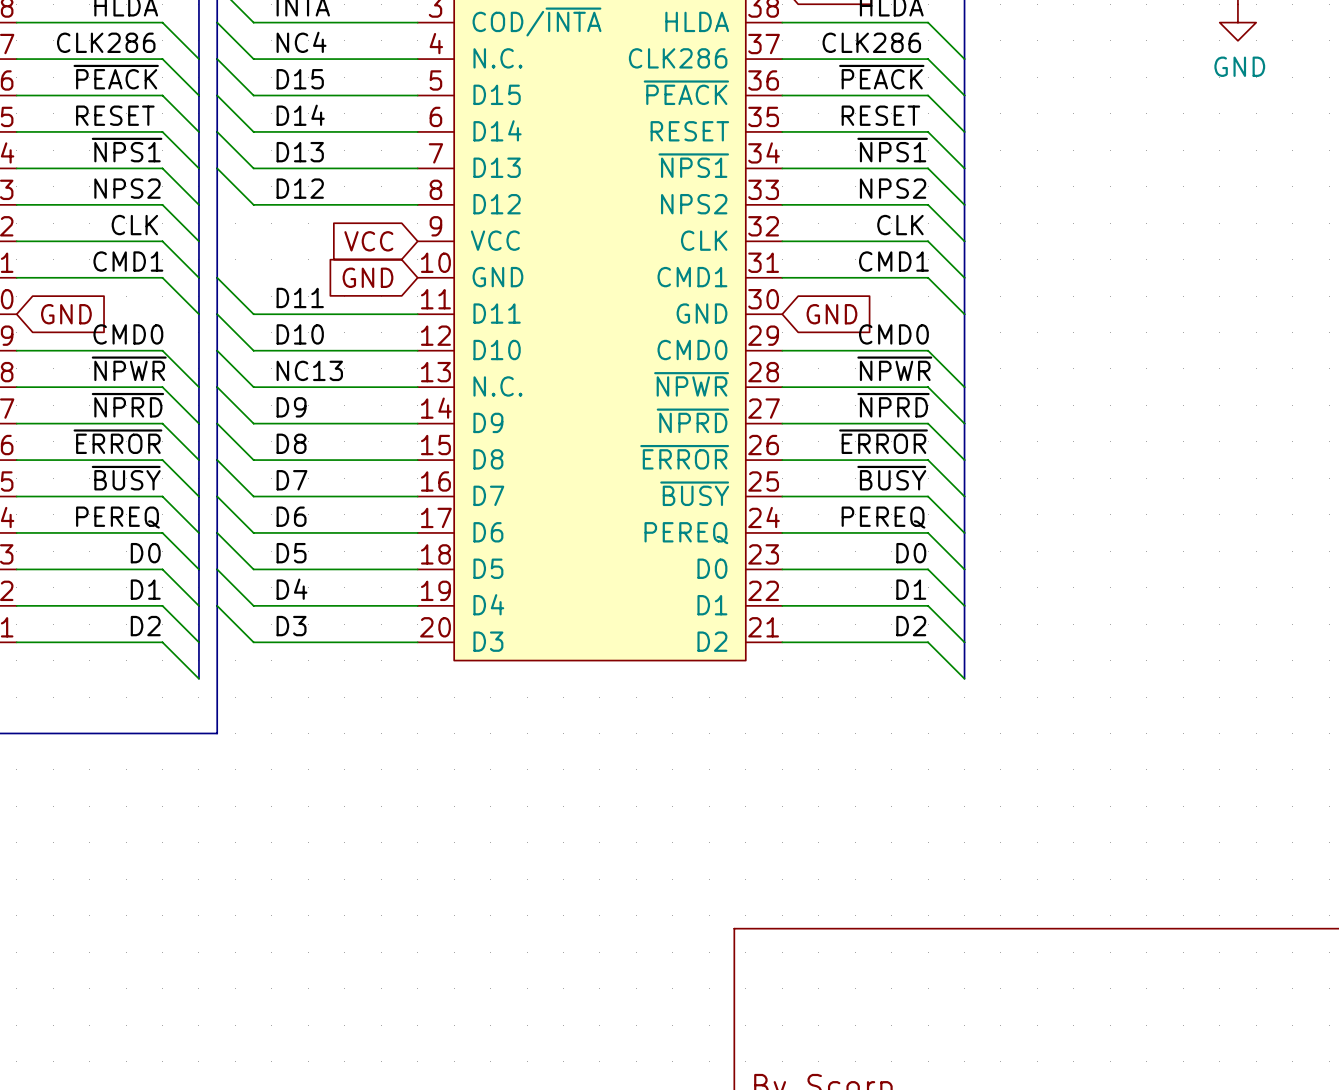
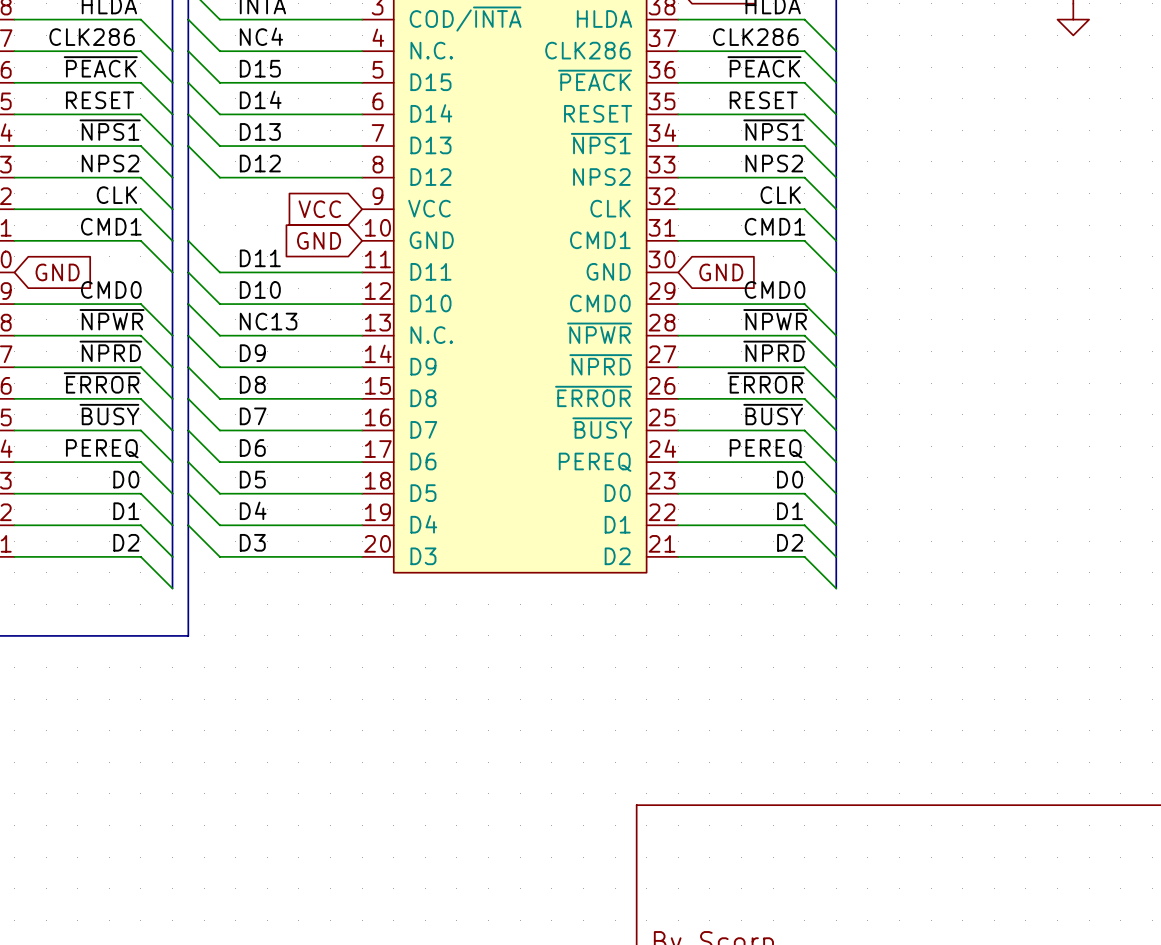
power symbol text: GND (1239, 66) -> none

